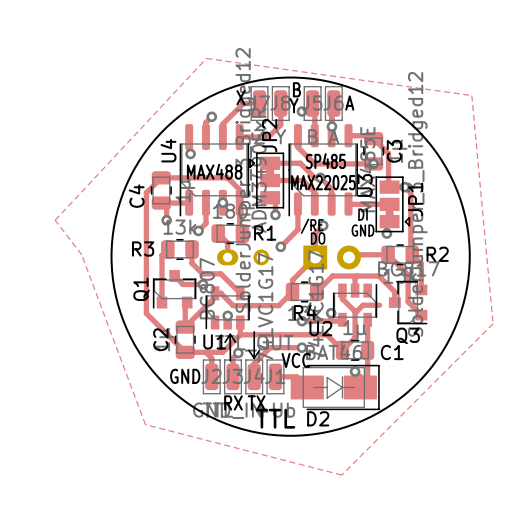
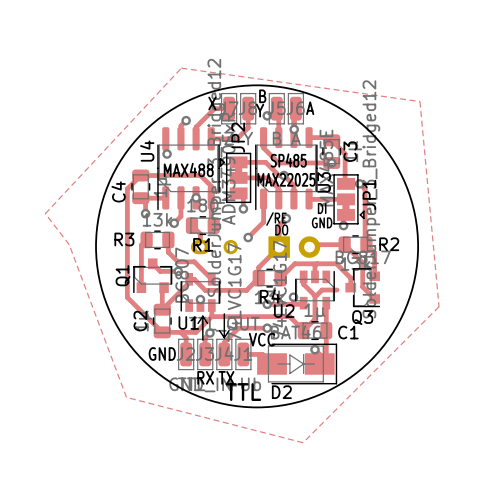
R1 name position: R1 (265, 233) -> R1 (203, 244)

